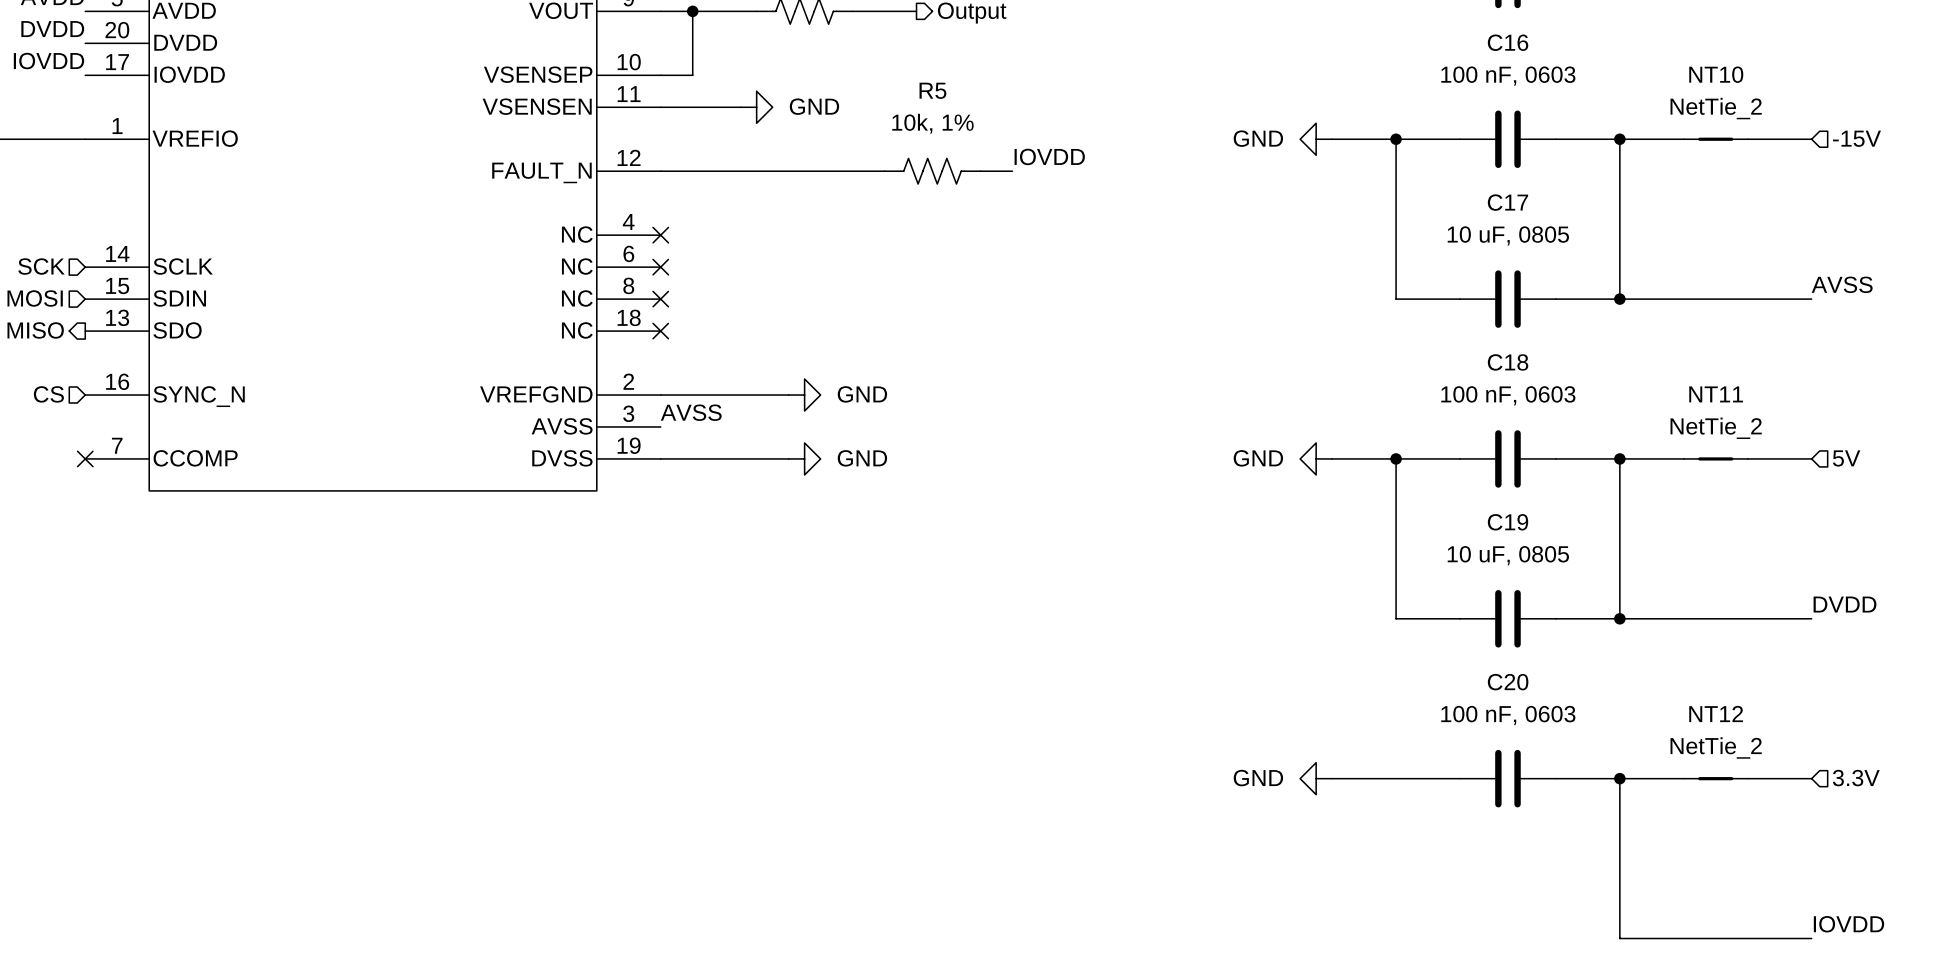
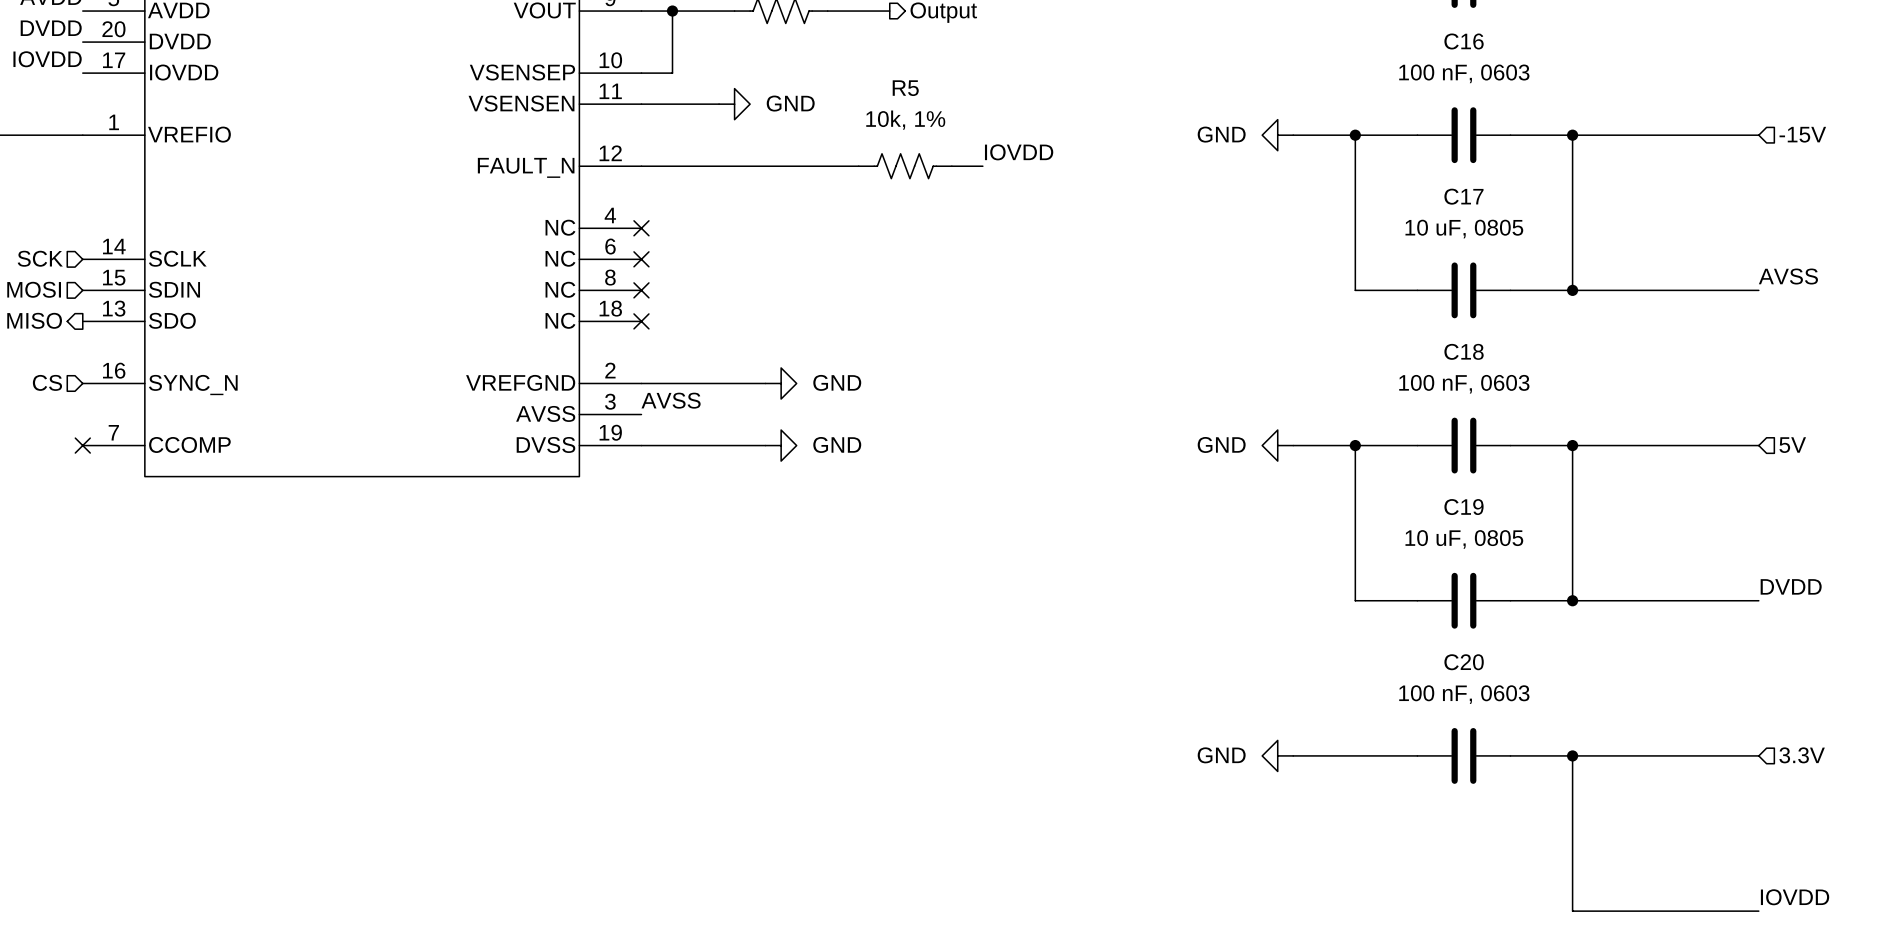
NT10: NetTie_2 (1715, 139) -> none
NT11: NetTie_2 (1715, 458) -> none
NT12: NetTie_2 (1715, 778) -> none

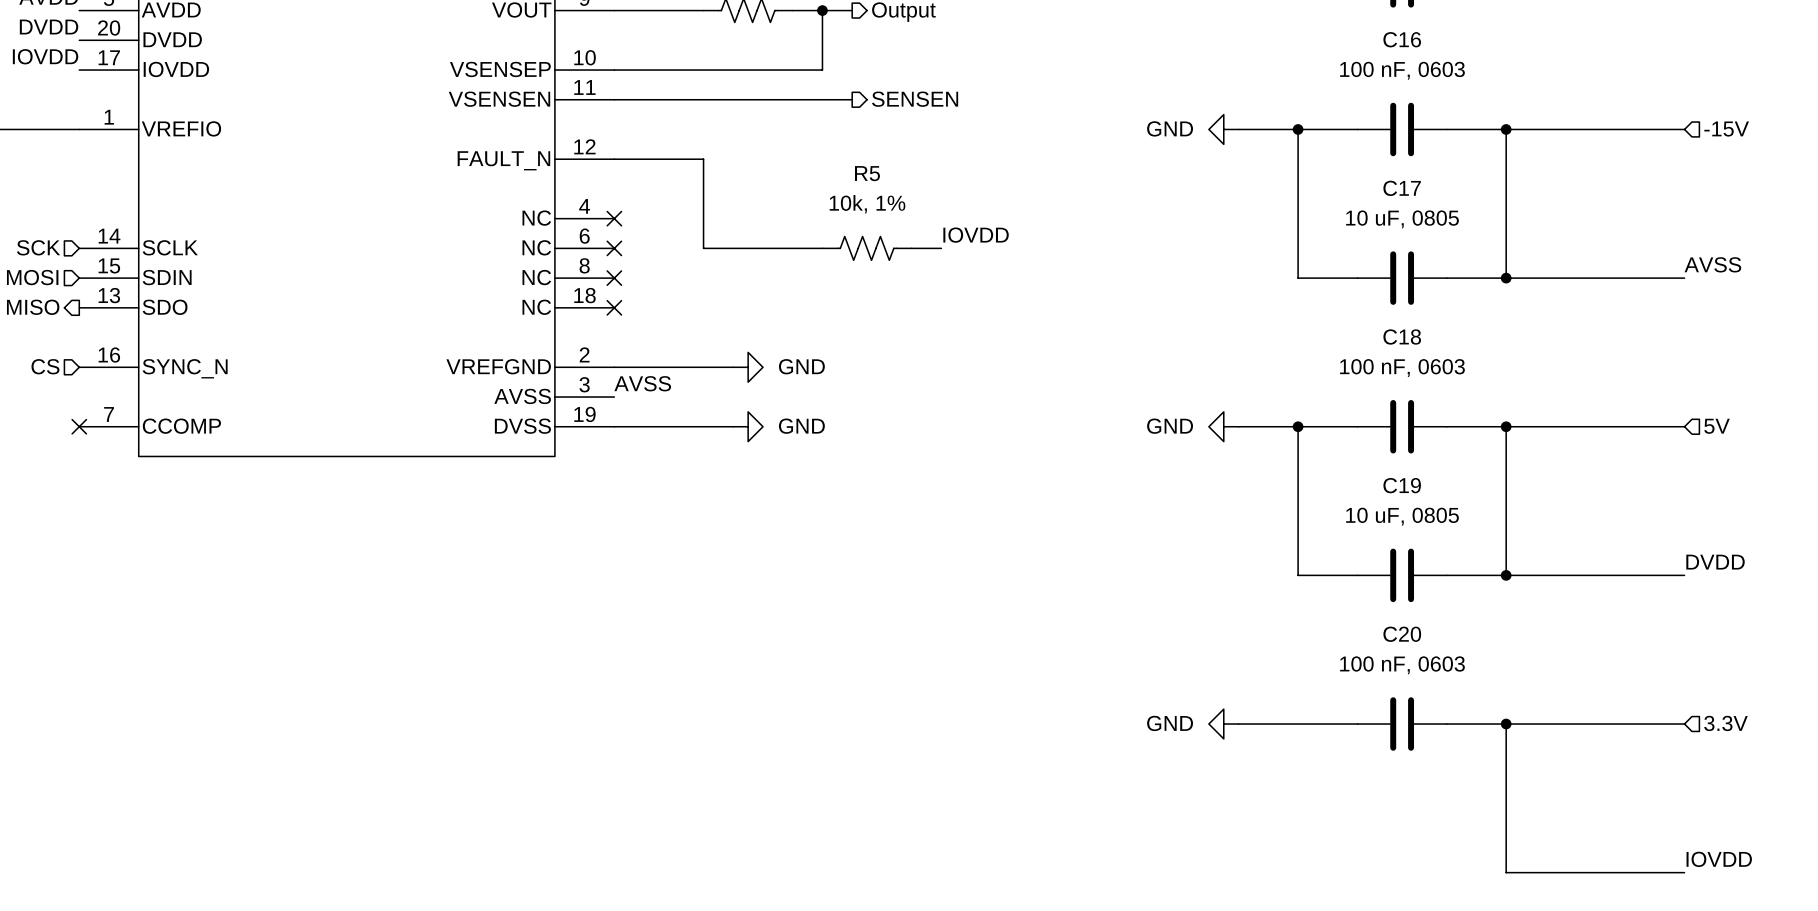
wire: (672, 11) (672, 73) -> (822, 10) (822, 70) (644, 70)
junction: (672, 11) -> none
junction: none -> (822, 10)
hierarchical label: none -> SENSEN (915, 99)
wire: none -> (688, 99) (852, 99)
power symbol: GND (734, 104) -> none
label position: IOVDD (1019, 152) -> IOVDD (976, 235)
wire: (734, 166) (858, 166) -> (703, 159) (703, 248) (822, 248)
R5 position: (905, 166) -> (867, 248)
wire: (951, 166) (982, 166) -> (911, 248) (941, 248)

